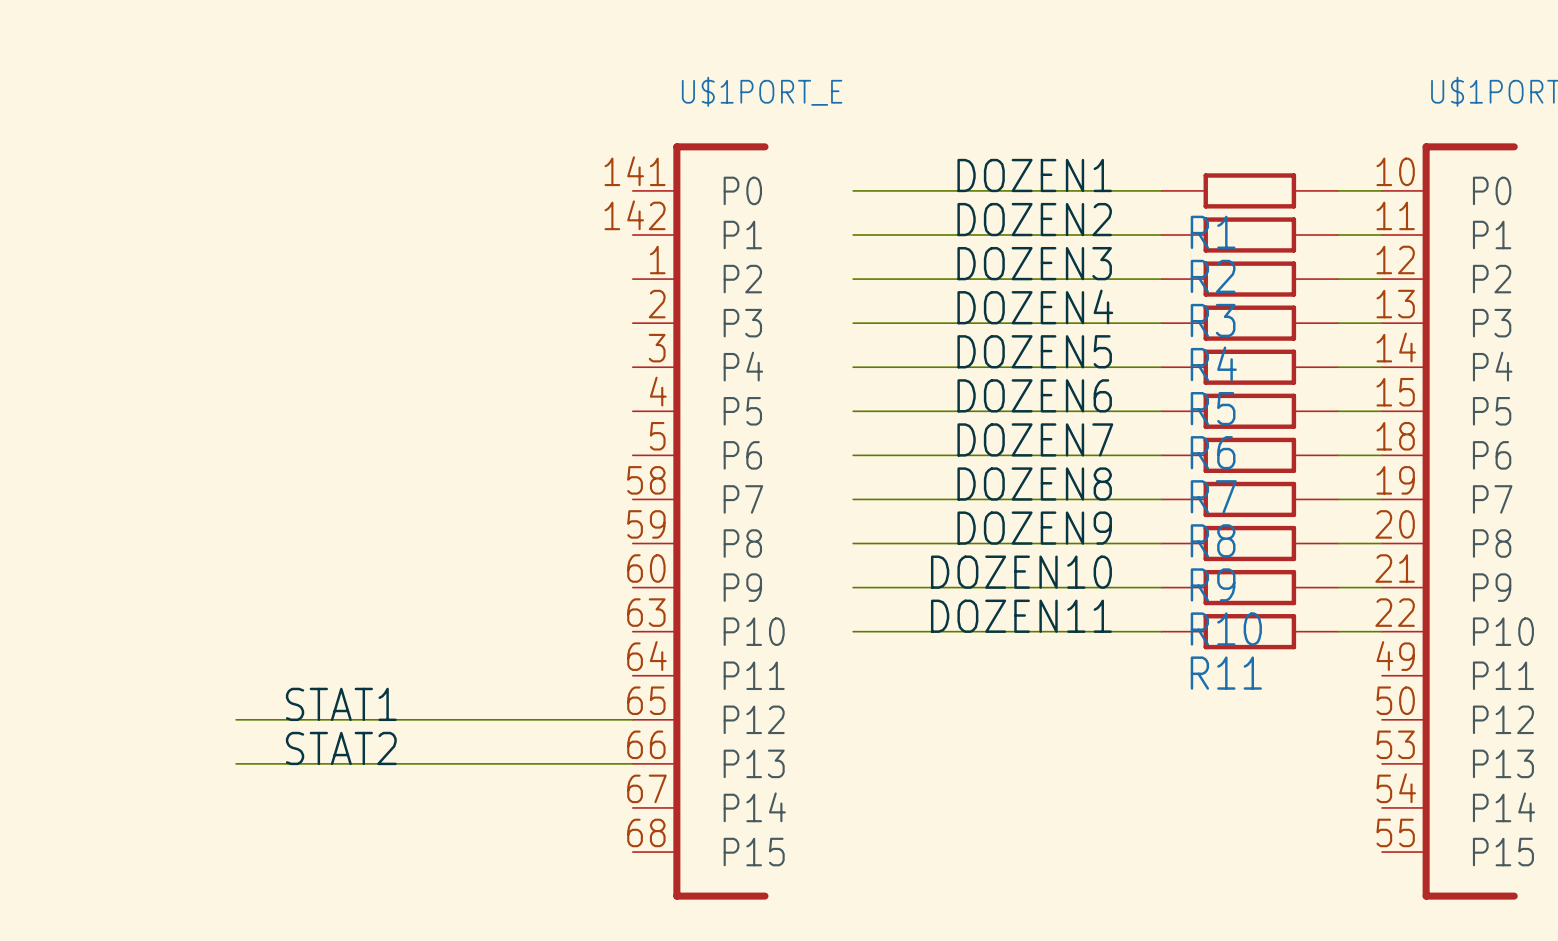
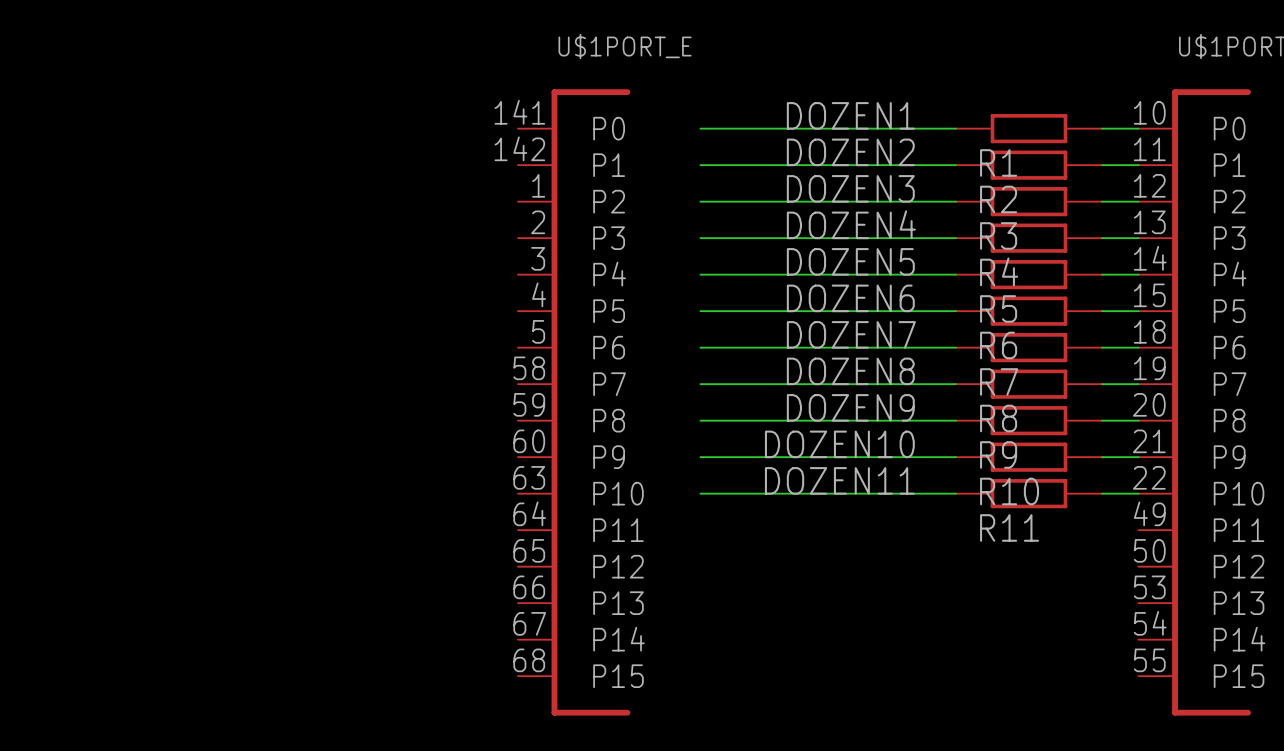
label: STAT1 (341, 704) -> none
wire: (236, 719) (632, 719) -> none
label: STAT2 (341, 748) -> none
wire: (236, 763) (632, 763) -> none

